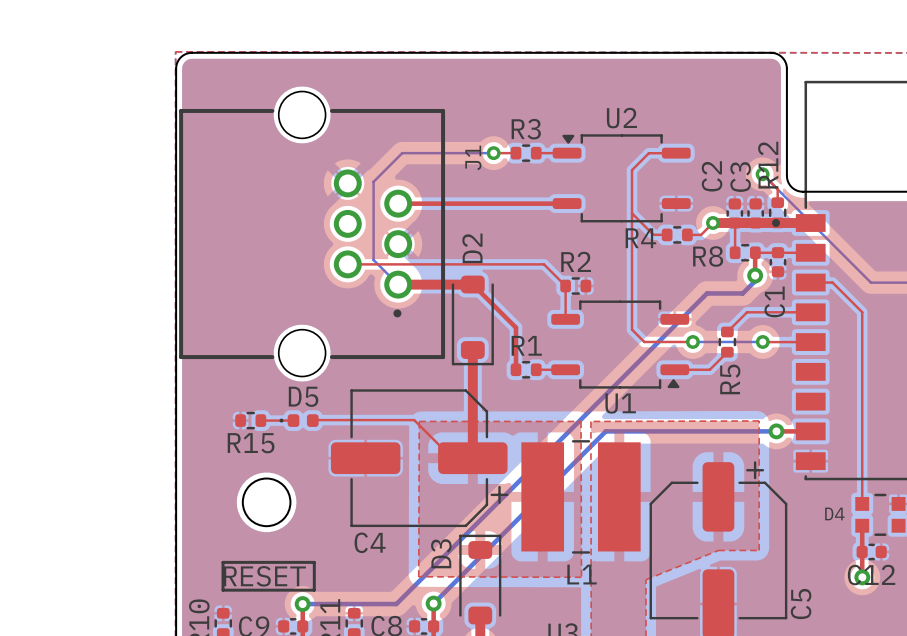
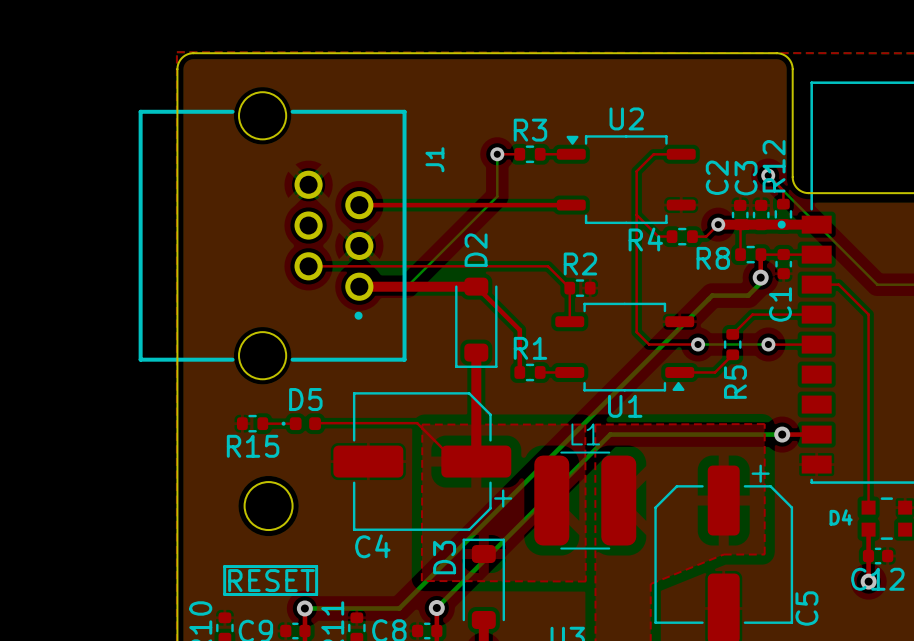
bottom track: (493, 153) (402, 153) (373, 181) (373, 260) (398, 284) -> (497, 154) (497, 196) (407, 286) (359, 286)
top track: none -> (359, 205) (401, 205)
J1 position: (312, 234) -> (272, 235)
top track: none -> (308, 266) (350, 266)
top track: none -> (359, 286) (401, 286)
L1 footprint: [521, 440, 641, 554] -> [534, 451, 637, 550]
L1 name position: L1 (582, 574) -> L1 (585, 434)

